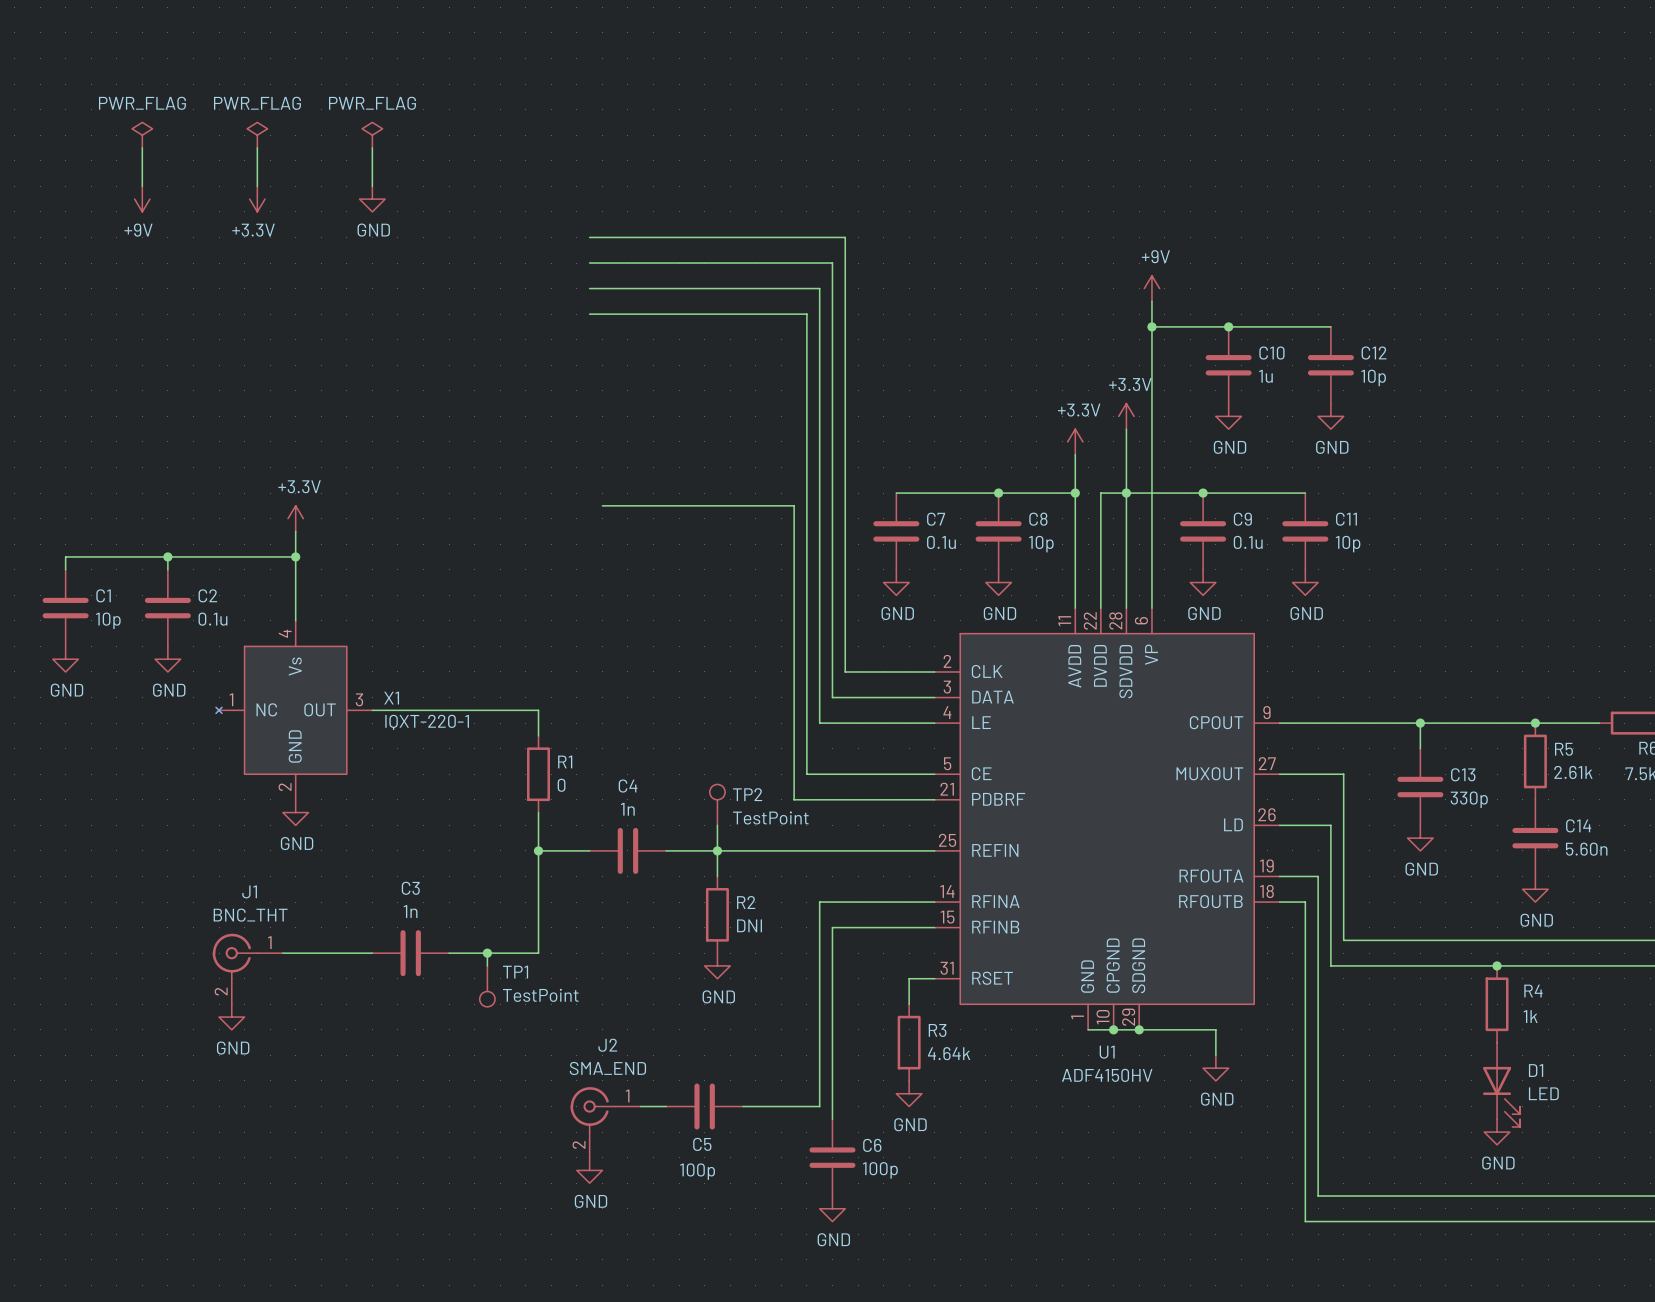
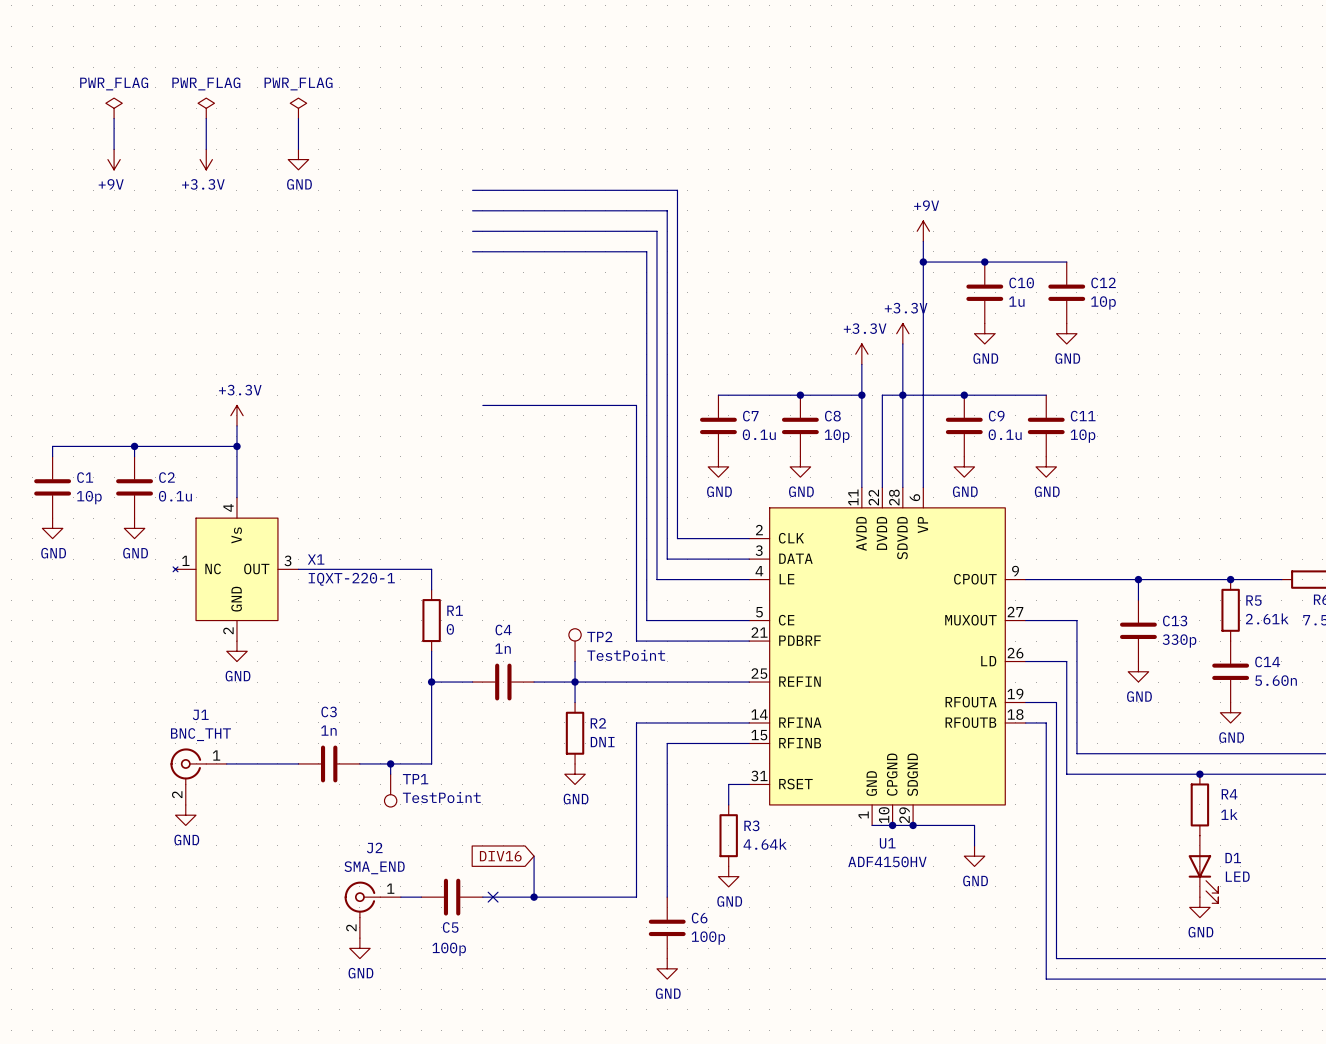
wire: (819, 902) (819, 1106) (743, 1106) -> (656, 722) (636, 722) (636, 897) (482, 897)
global label: none -> DIV16 (500, 856)
wire: none -> (534, 856) (534, 897)
wire: (640, 1106) (666, 1106) -> (400, 897) (421, 897)
C5 position: (704, 1106) -> (452, 897)
no-connect mark: none -> (493, 897)
junction: none -> (534, 897)
J2 position: (605, 1122) -> (372, 909)
power symbol position: GND (589, 1170) -> GND (359, 948)

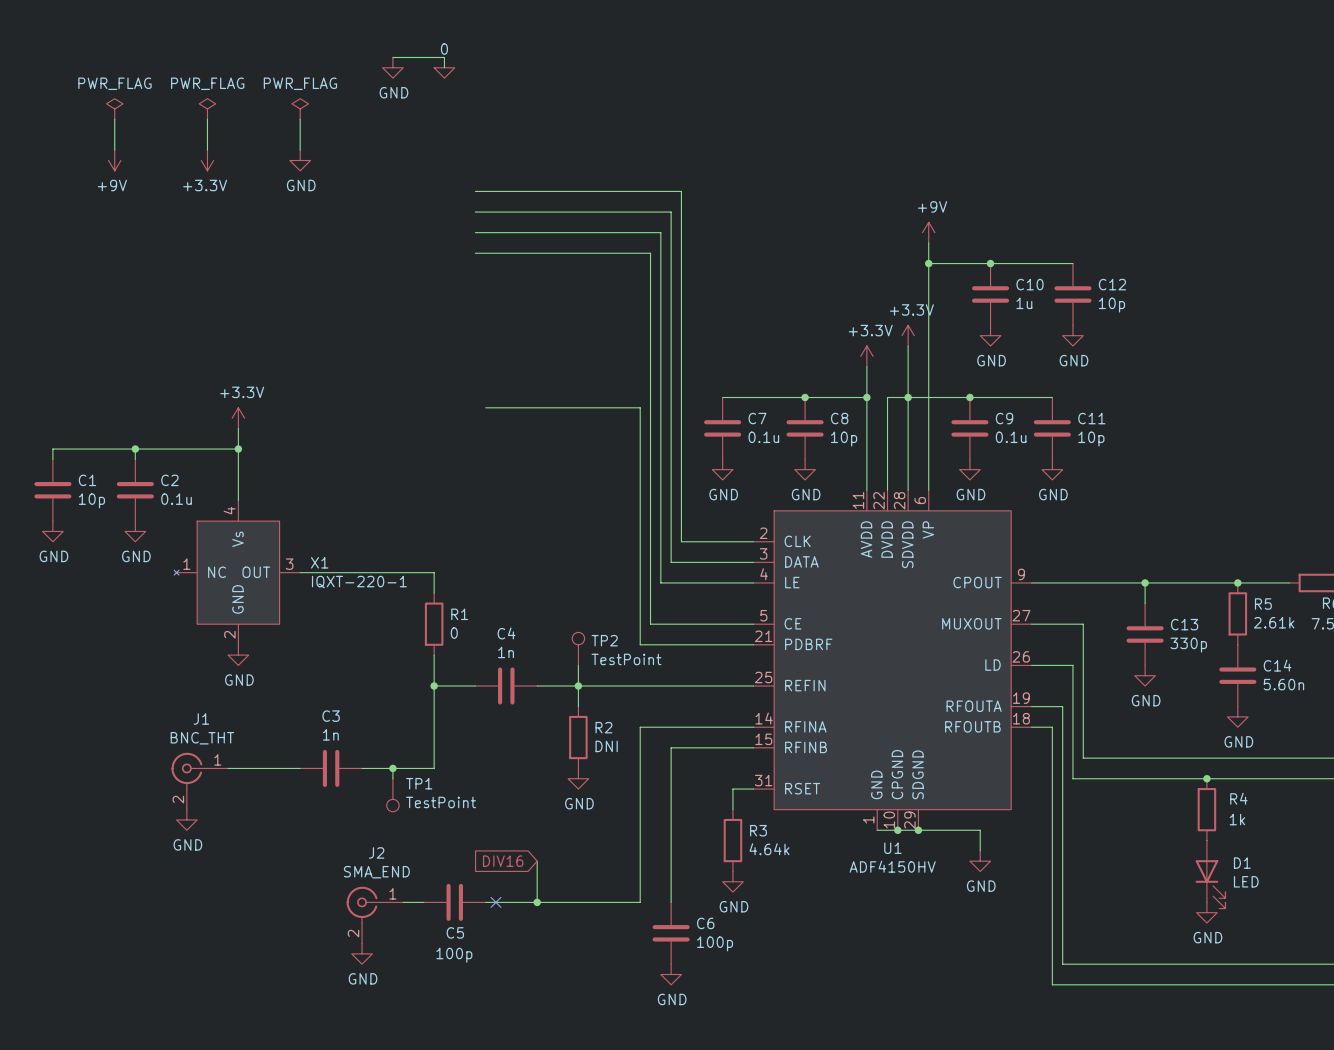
wire: none -> (392, 57) (444, 57) (444, 67)
power symbol: none -> GND (392, 67)
power symbol: none -> 0 (444, 72)

